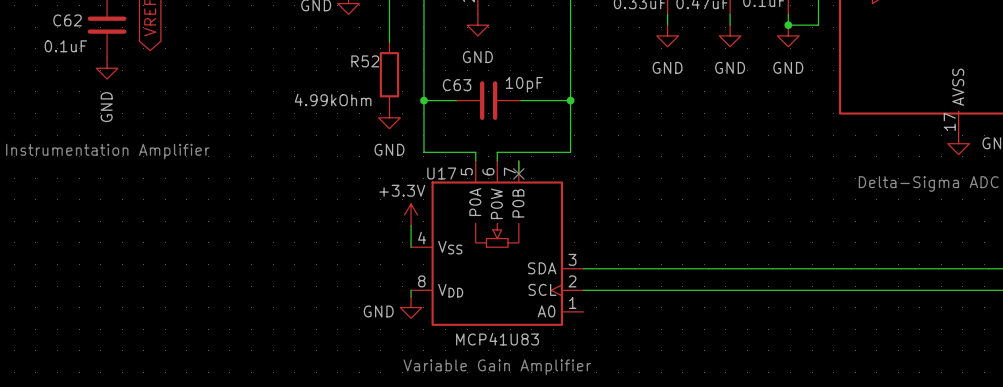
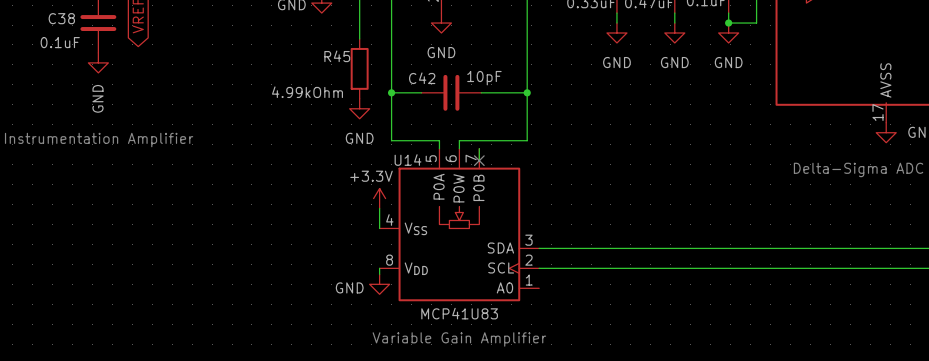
C62 name: C62 (67, 20) -> C38 (61, 18)
R52 name: R52 (365, 61) -> R45 (337, 56)
C63 name: C63 (457, 85) -> C42 (422, 78)
U17 name: U17 (441, 173) -> U14 (408, 160)

